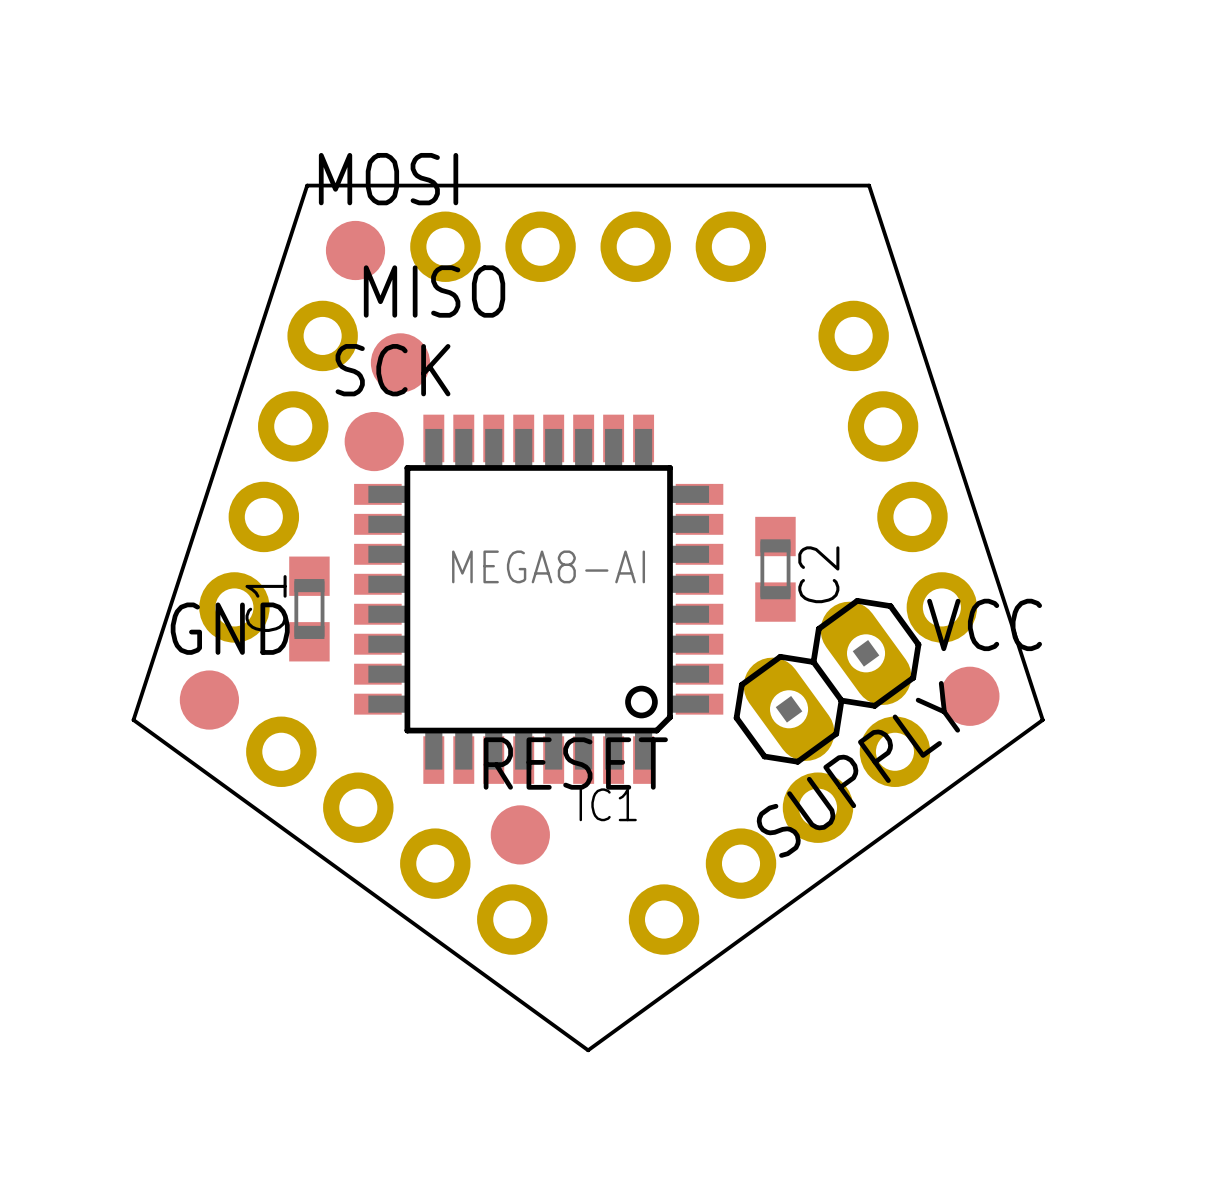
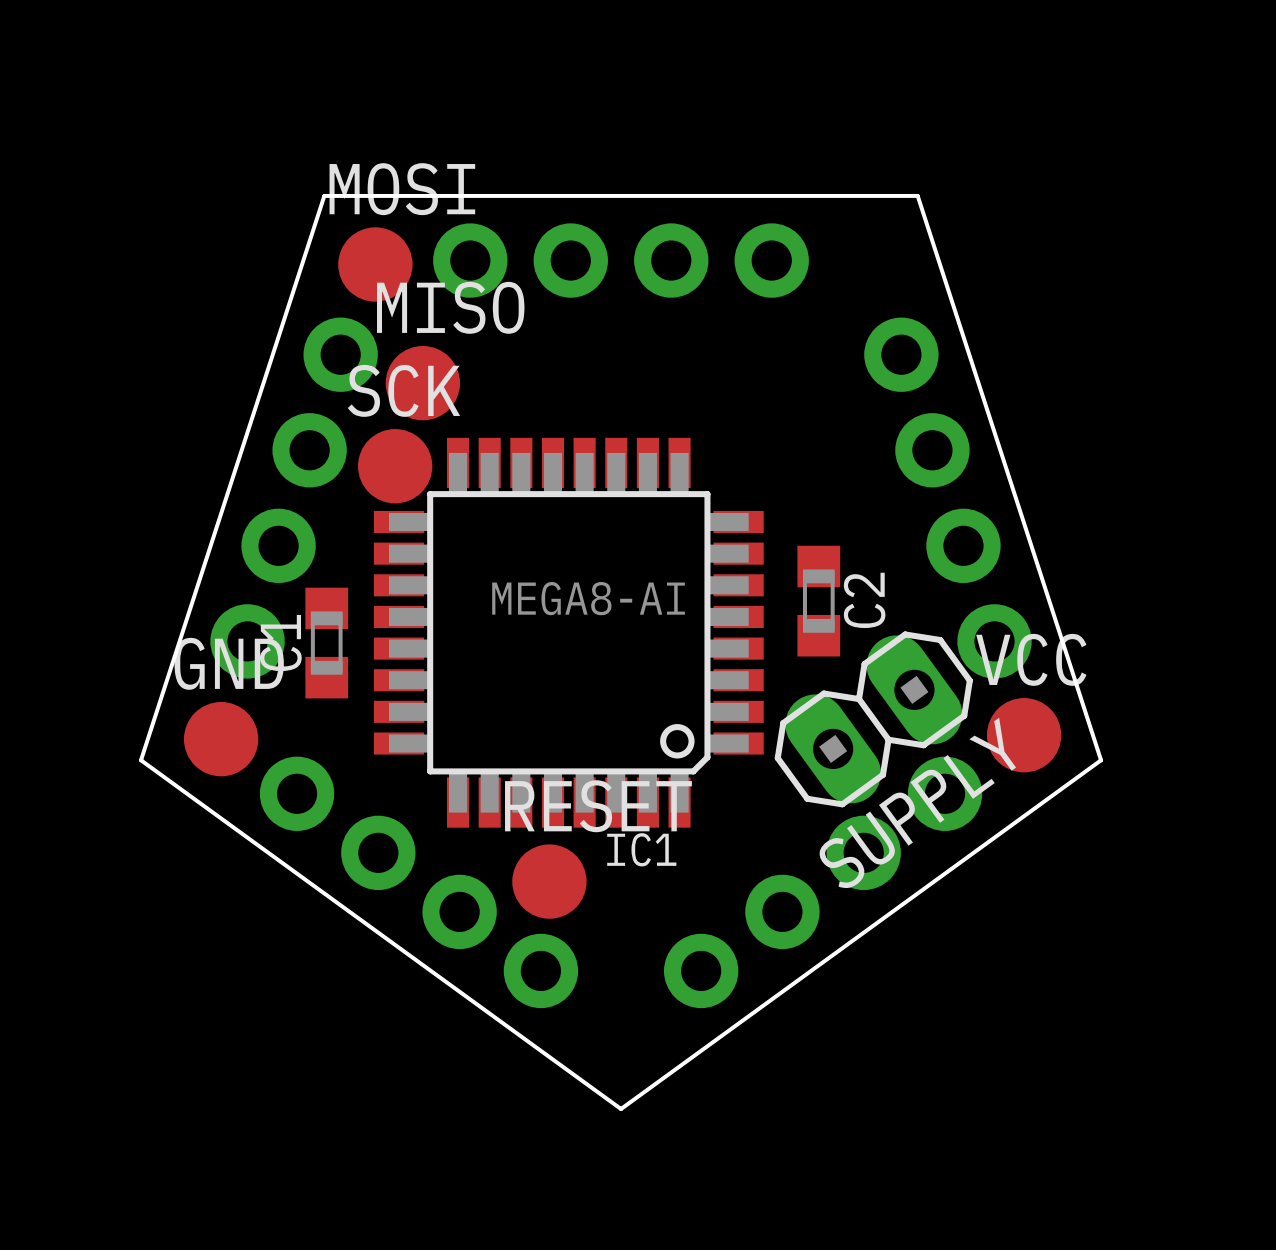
MOSI footprint: [325, 220, 386, 281] -> [338, 227, 413, 302]
MISO footprint: [370, 333, 431, 393] -> [385, 345, 461, 421]
SCK footprint: [344, 411, 404, 472] -> [357, 429, 433, 504]
VCC footprint: [940, 666, 1000, 726] -> [986, 698, 1062, 773]
GND footprint: [179, 670, 240, 730] -> [183, 702, 259, 777]
RESET footprint: [490, 805, 550, 865] -> [512, 844, 587, 919]

